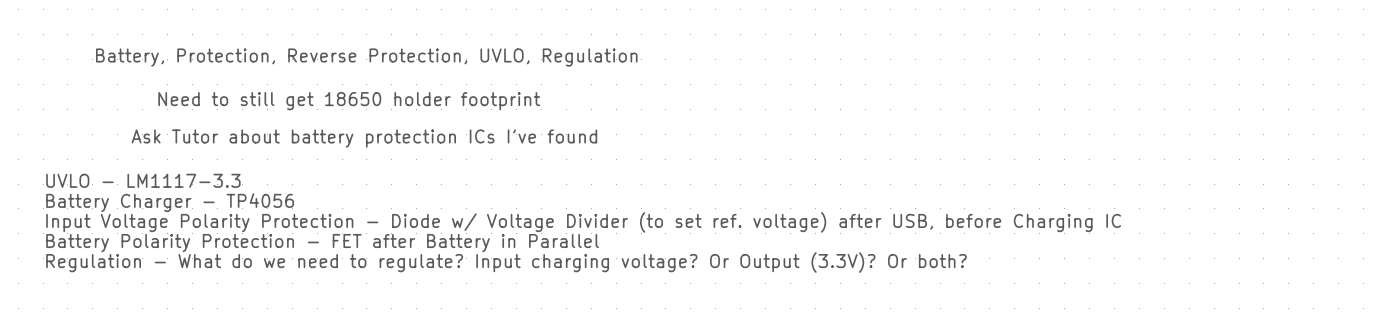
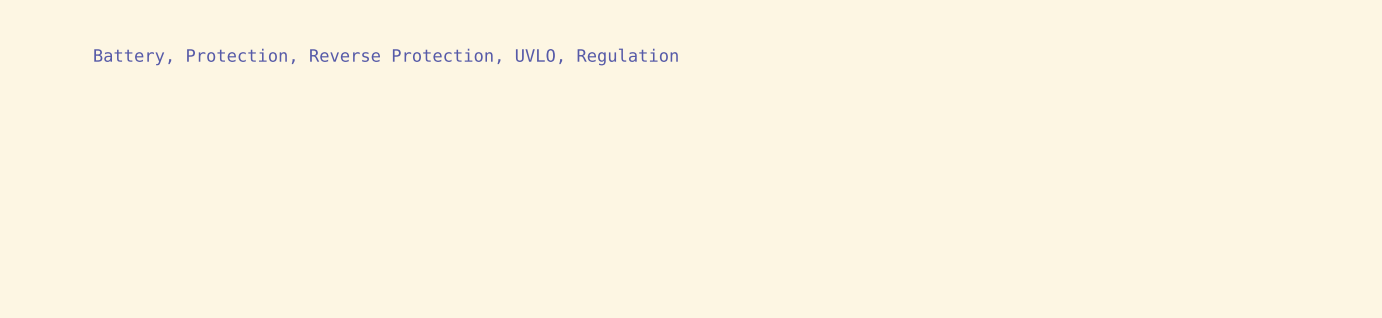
text: Need to still get 18650 holder footprint (349, 101) -> none
text: Ask Tutor about battery protection ICs I've found (364, 138) -> none
text: UVLO - LM1117-3.3 (143, 180) -> none
text: Battery Charger - TP4056 (170, 202) -> none
text: Input Voltage Polarity Protection - Diode w/ Voltage Divider (to set ref. voltage) after USB, before Charging IC (583, 222) -> none
text: Battery Polarity Protection - FET after Battery in Parallel (322, 243) -> none
text: Regulation - What do we need to regulate? Input charging voltage? Or Output (3.3V)? Or both? (506, 262) -> none

